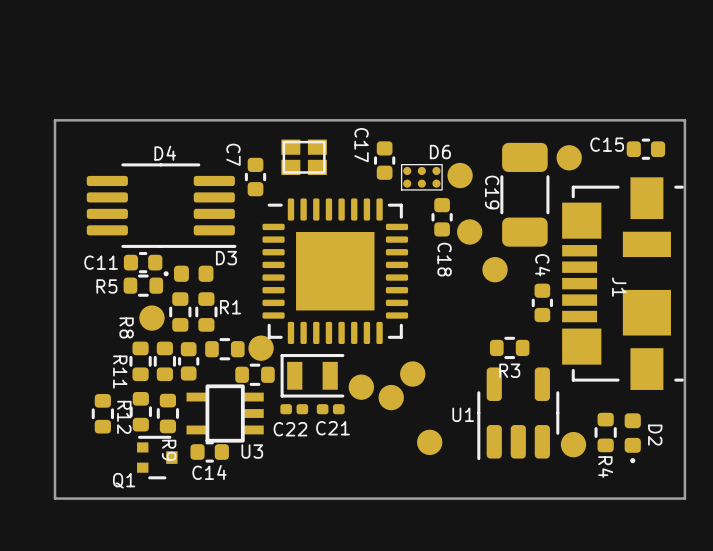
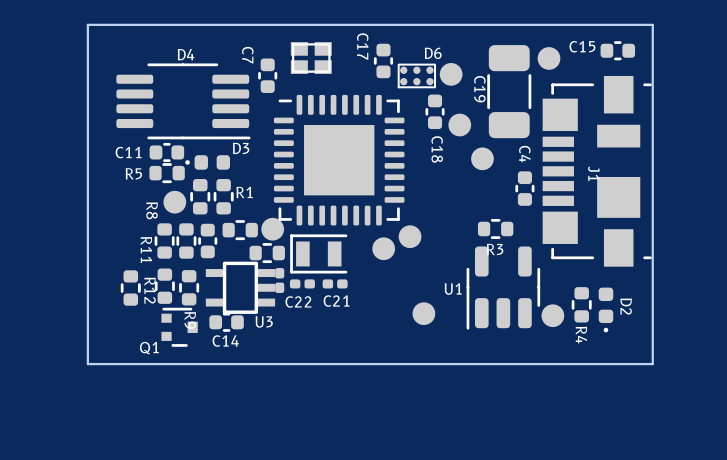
part: none -> (410, 236)
part: none -> (383, 248)
part: (412, 374) -> none
part: (361, 387) -> none
part: (391, 397) -> none
part: none -> (279, 280)

